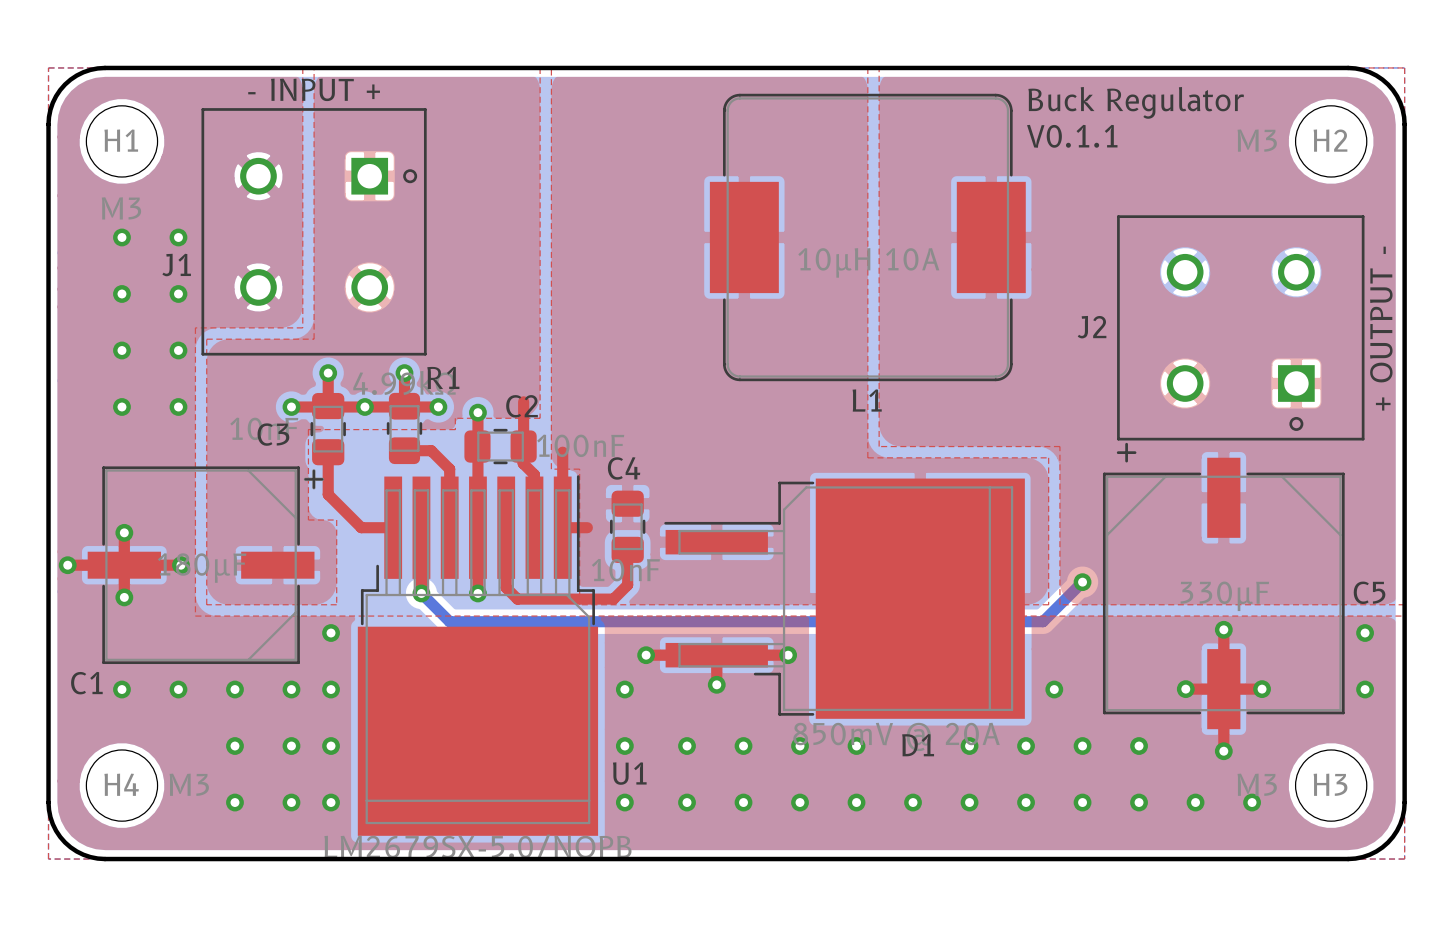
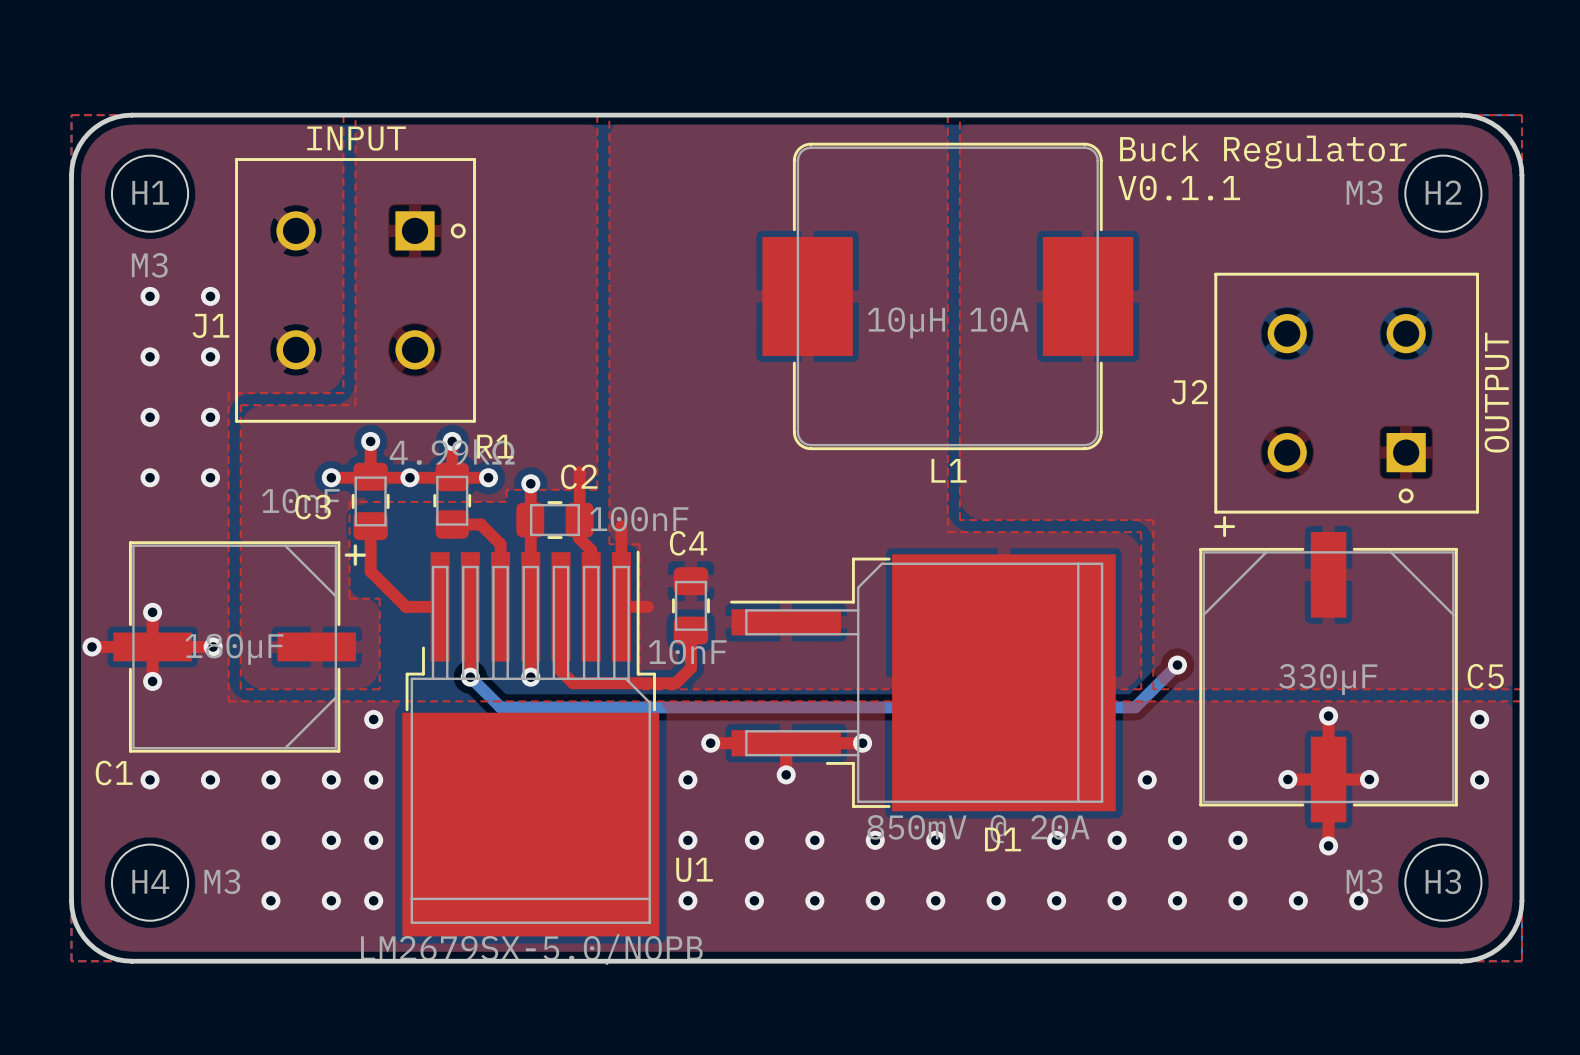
J1 value: - INPUT + (314, 89) -> INPUT (356, 138)
L1 footprint: [709, 93, 1026, 382] -> [762, 142, 1134, 451]
J2 value: + OUTPUT - (1381, 328) -> OUTPUT (1496, 392)

